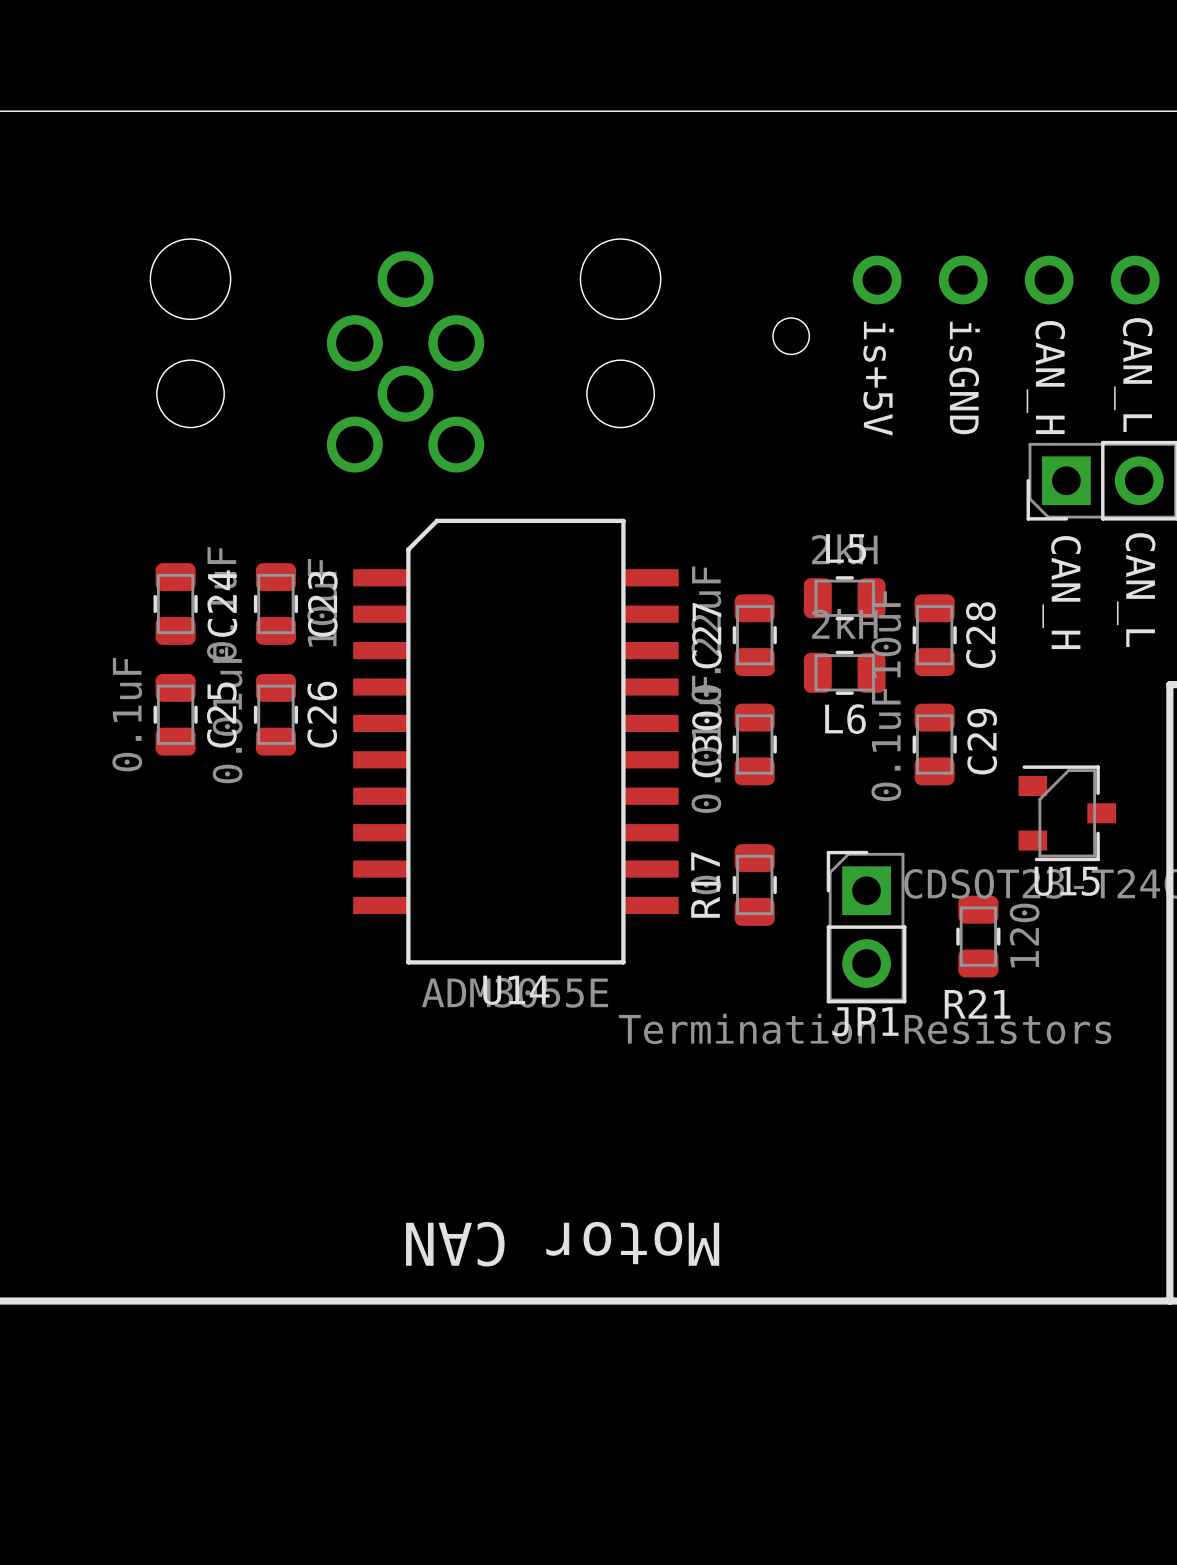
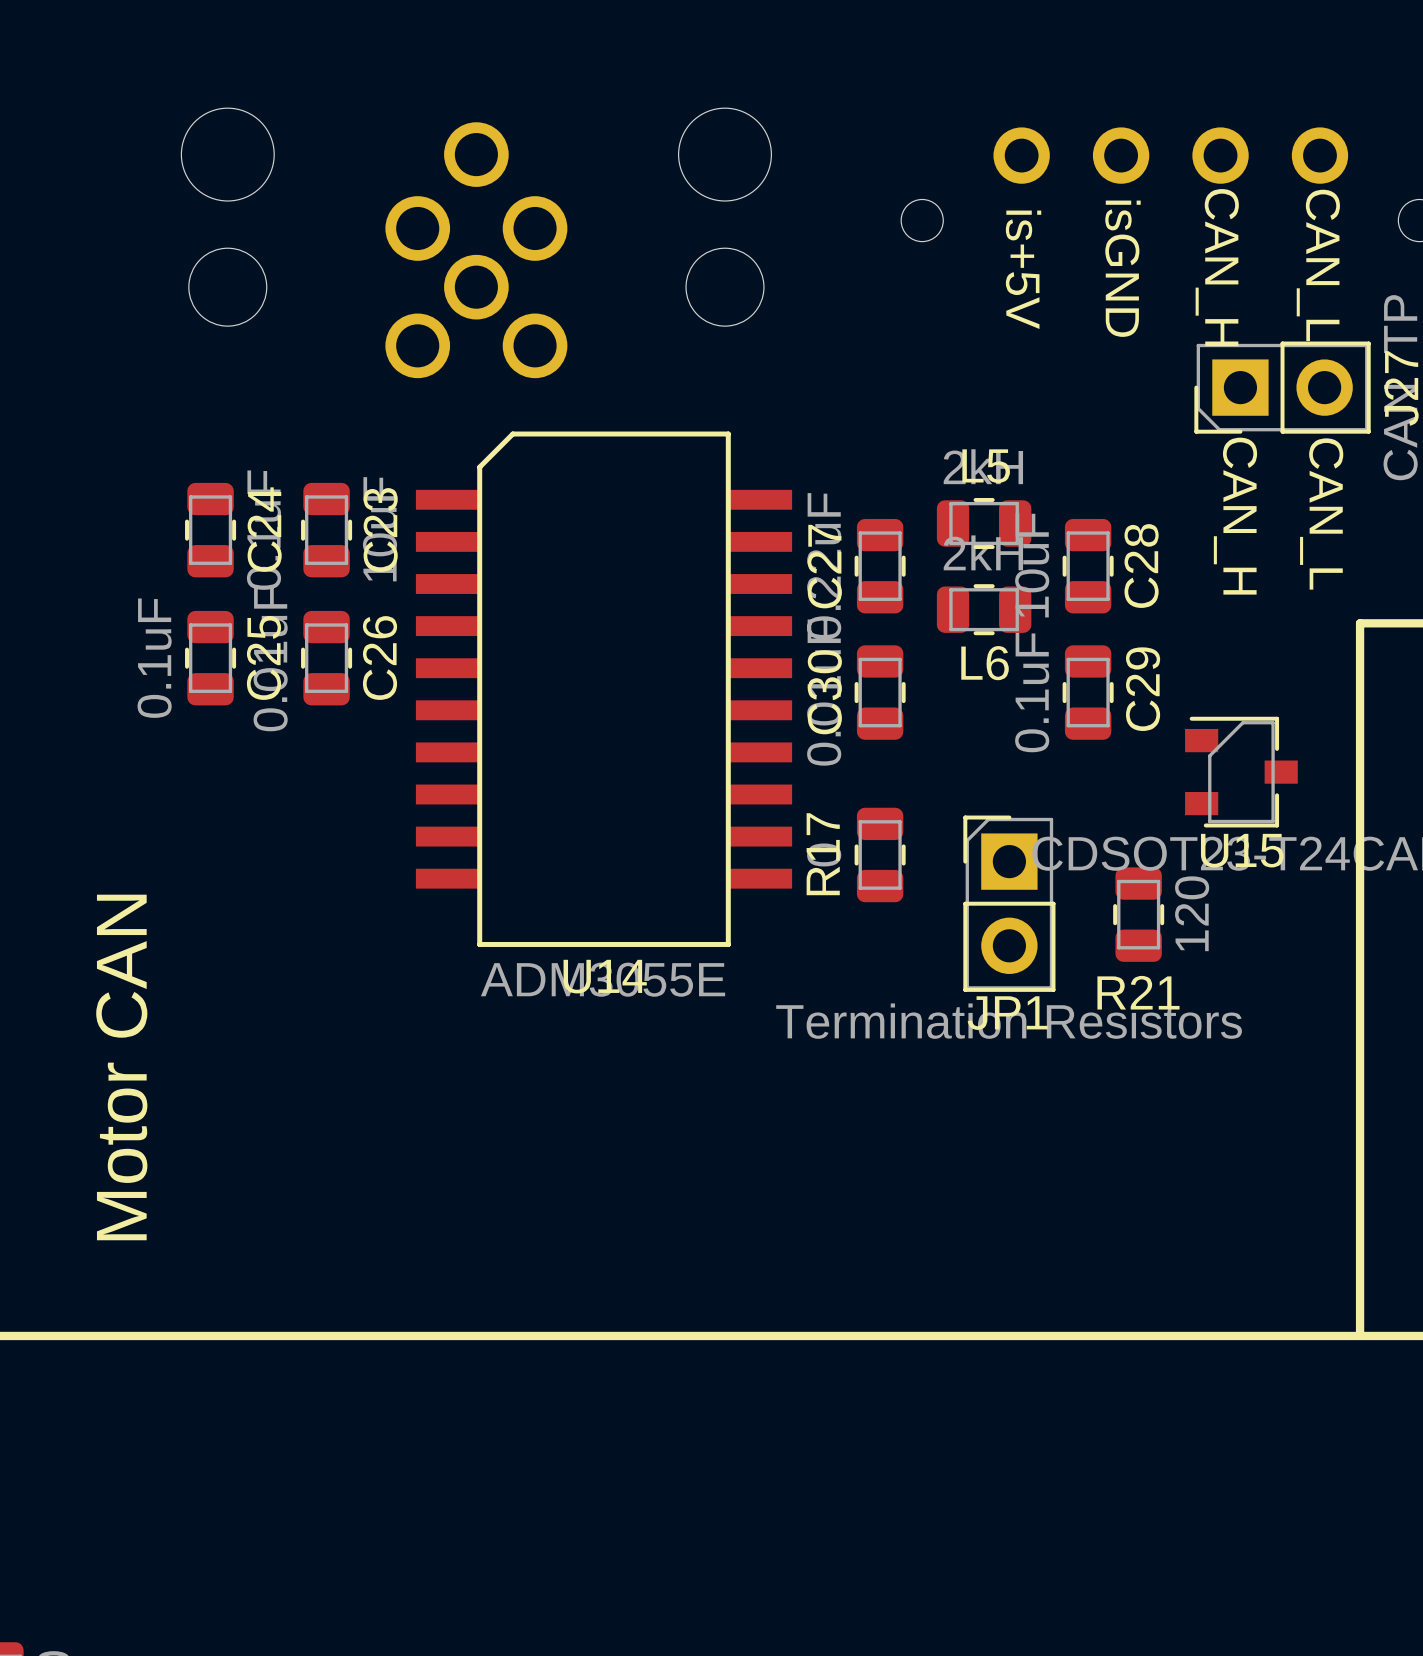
text rotation: 0° (562, 1244) -> 90° clockwise (121, 1067)
text position: Motor CAN (562, 1244) -> Motor CAN (121, 1067)

